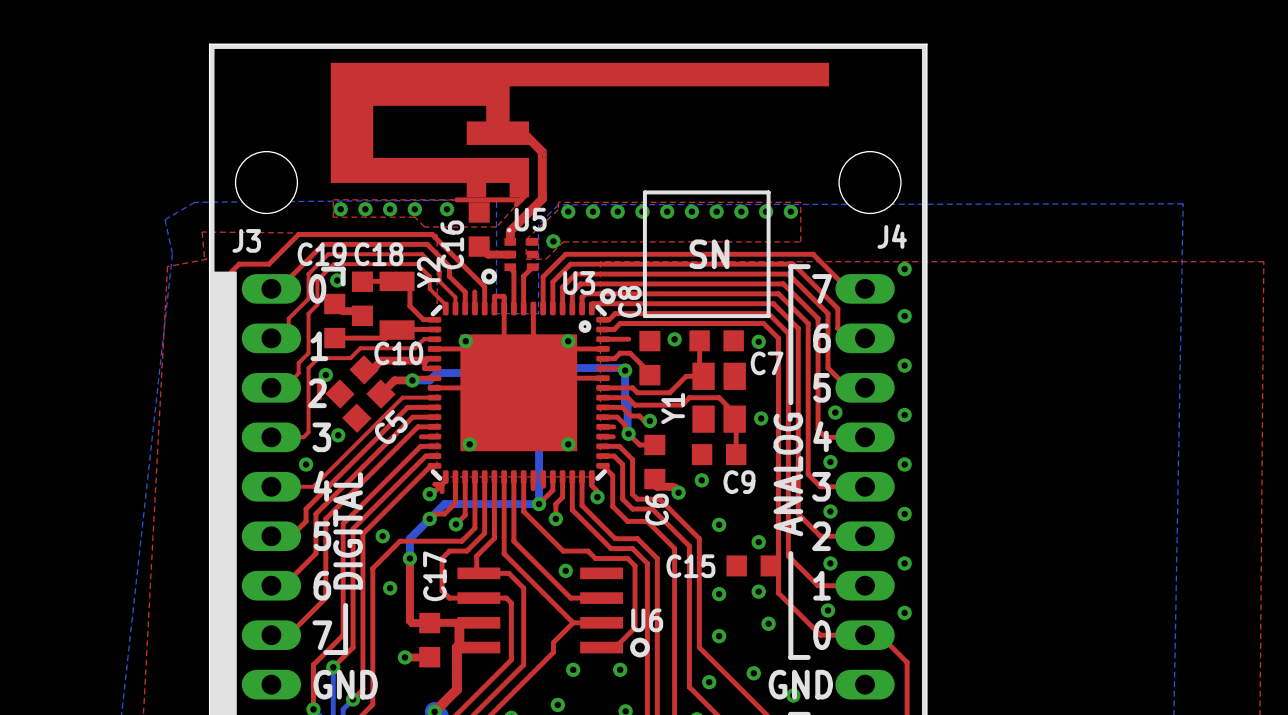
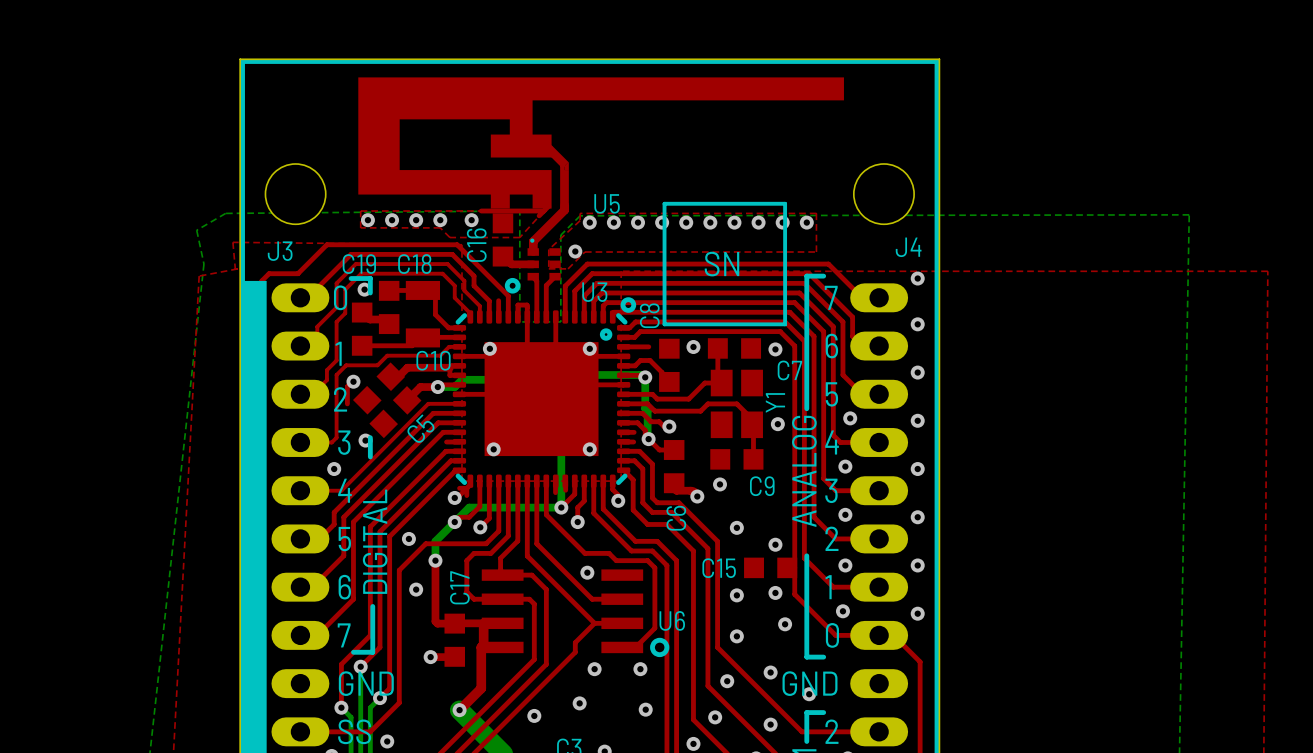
text position: U5 (530, 219) -> U5 (607, 203)
text: Y2 (428, 272) -> none
Y1 name position: Y1 (673, 408) -> Y1 (775, 402)
line: none -> (370, 437) (370, 456)

